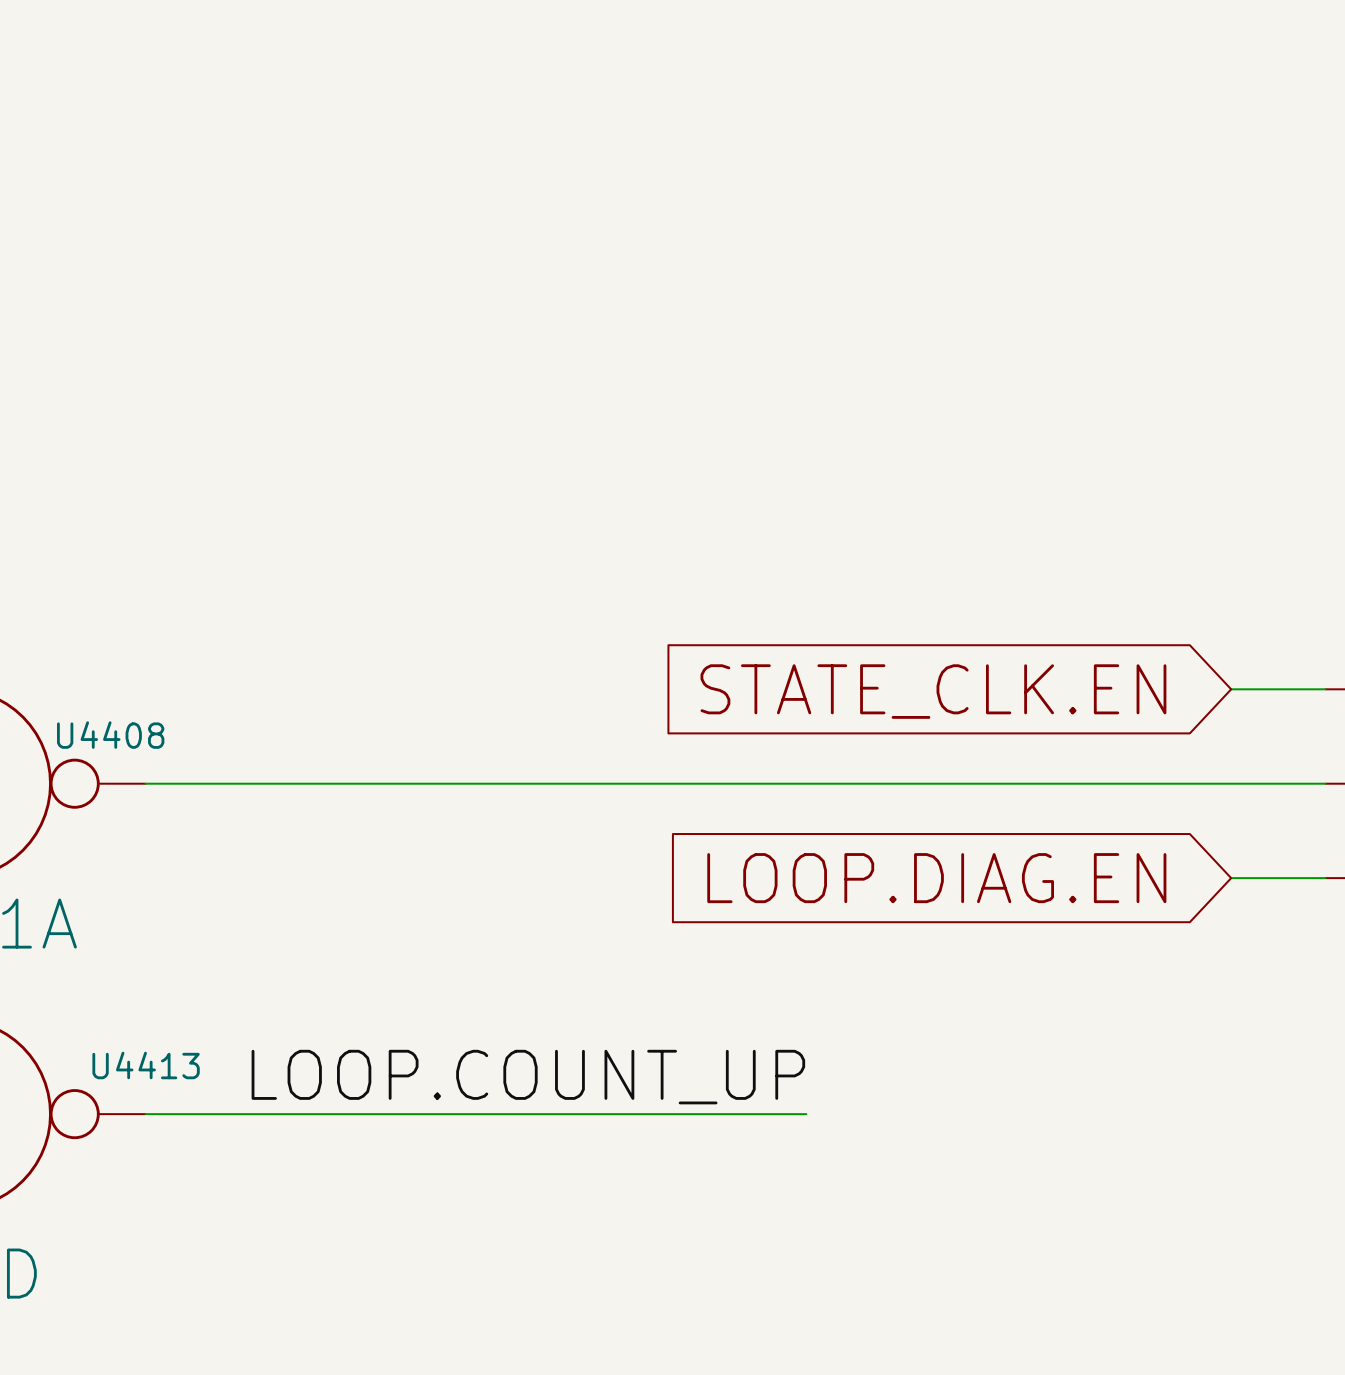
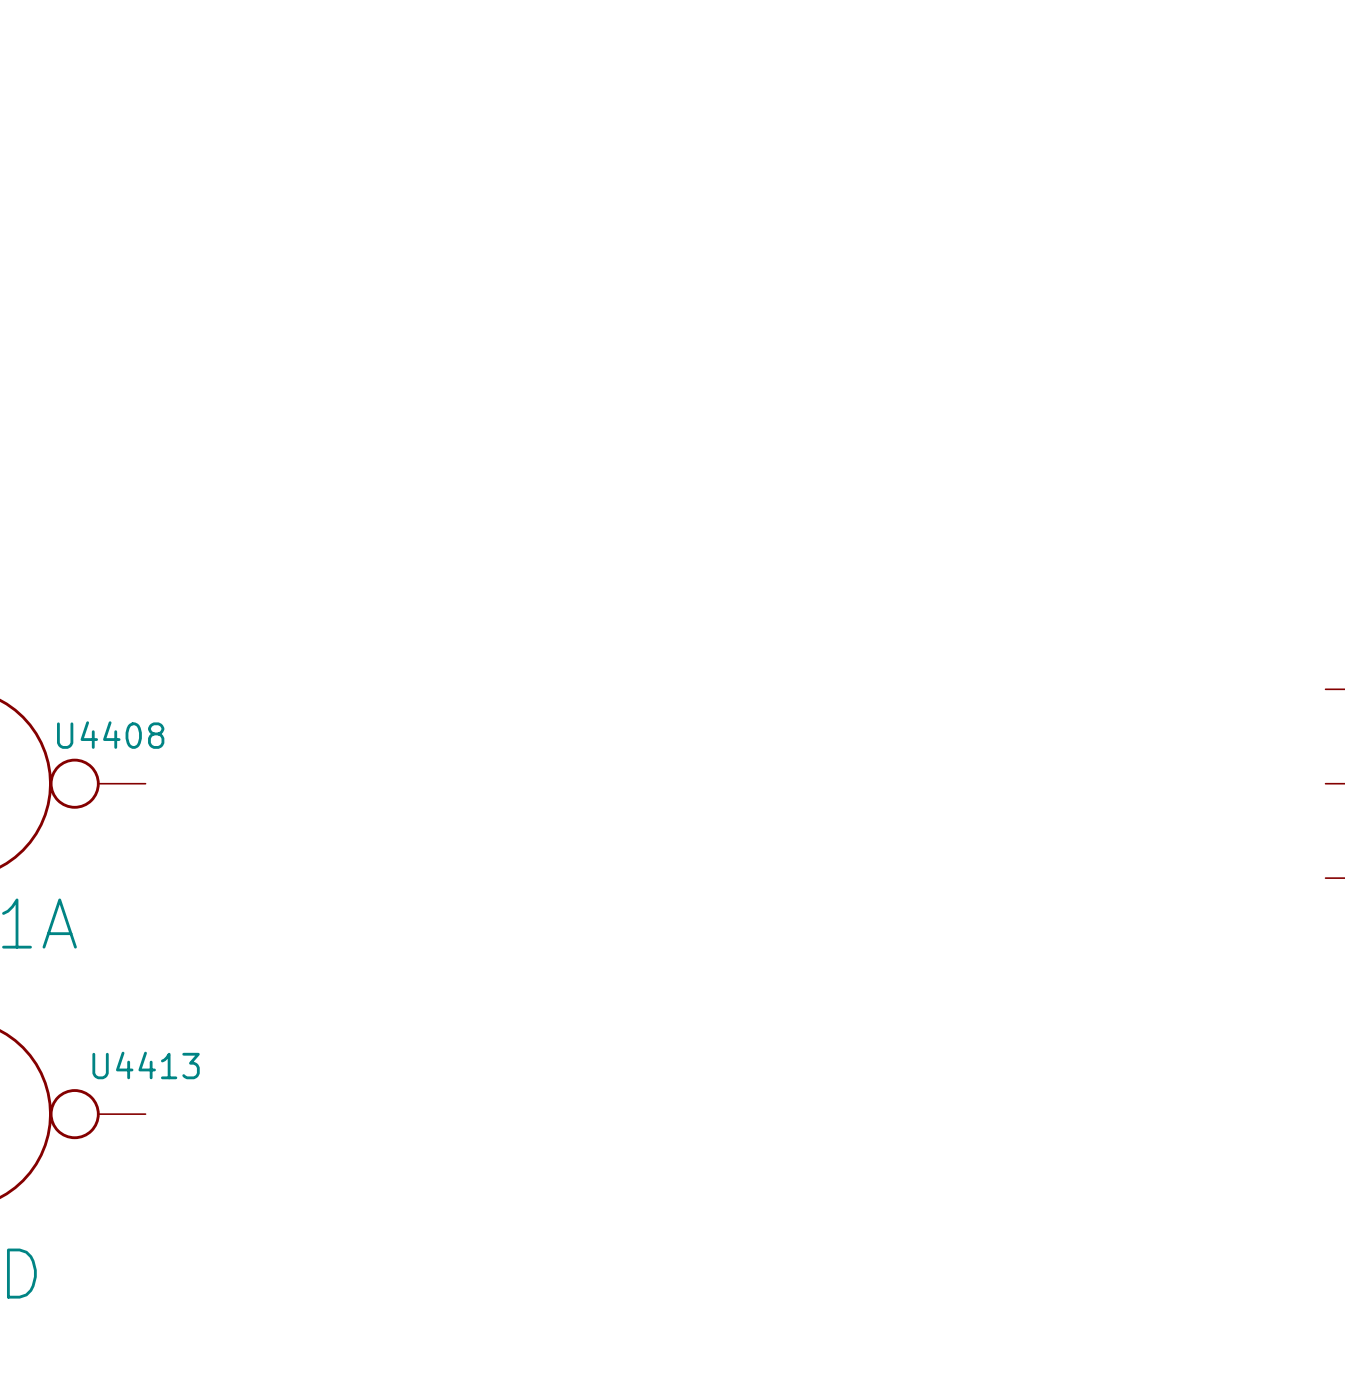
wire: (1231, 689) (1325, 689) -> none
global label: STATE_CLK.EN (933, 691) -> none
wire: (145, 783) (1325, 783) -> none
global label: LOOP.DIAG.EN (936, 878) -> none
wire: (1231, 878) (1325, 878) -> none
label: LOOP.COUNT_UP (528, 1077) -> none
wire: (145, 1114) (806, 1114) -> none

